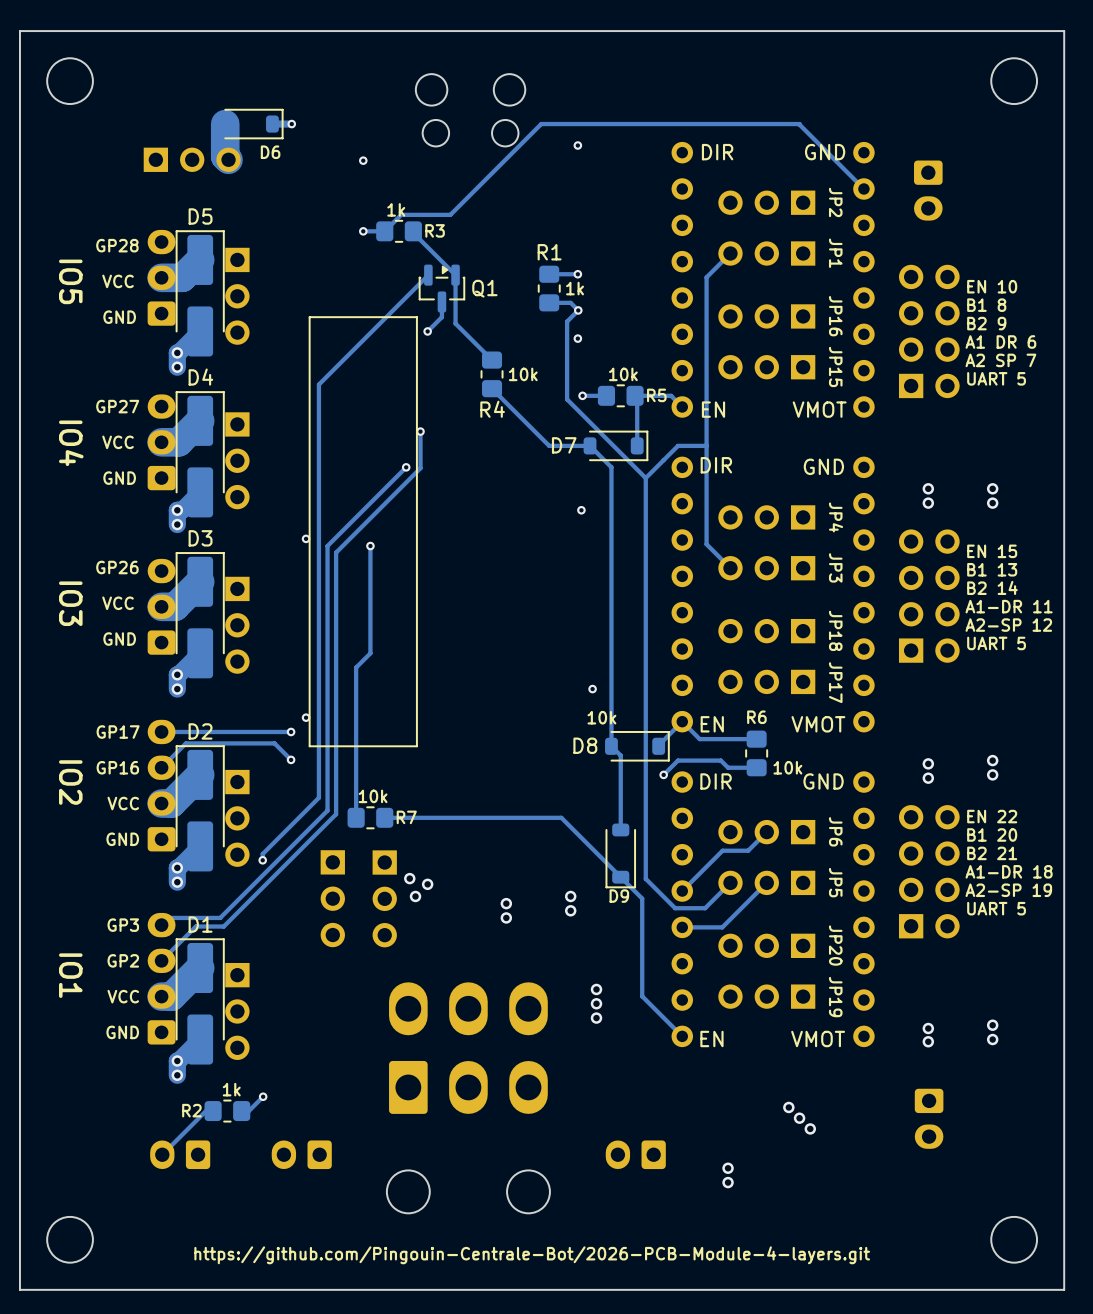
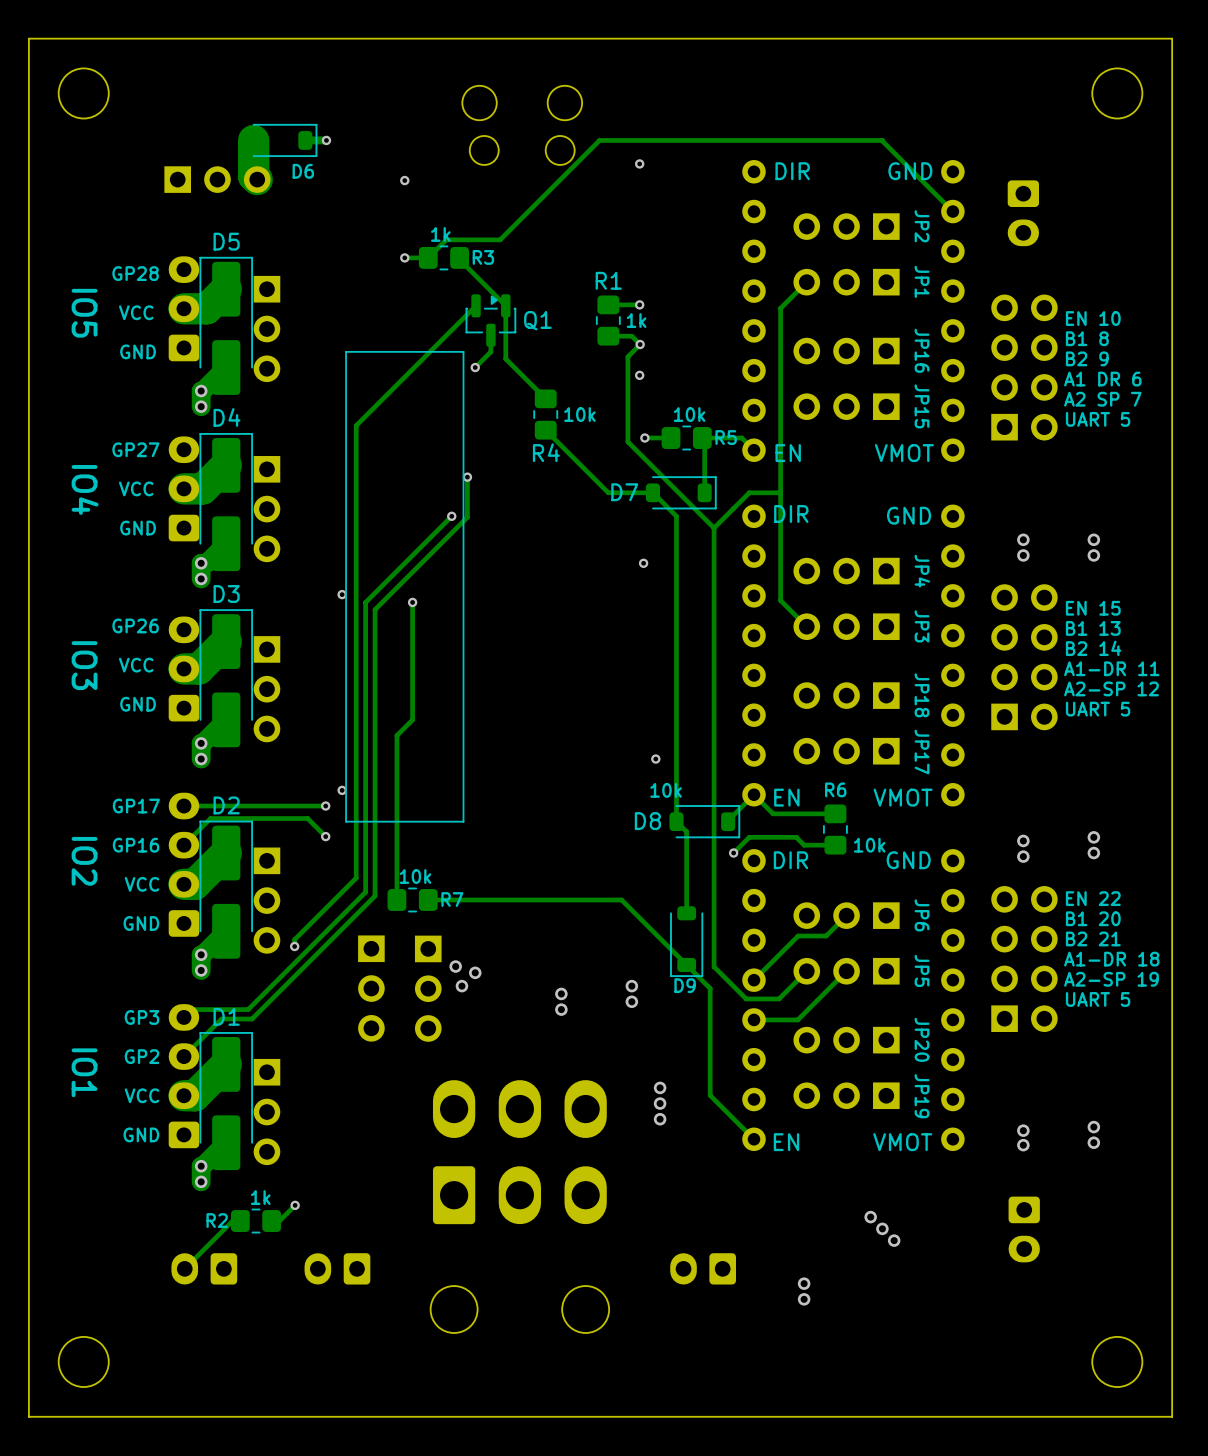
text: https://github.com/Pingouin-Centrale-Bot/2026-PCB-Module-4-layers.git (532, 1255) -> none

